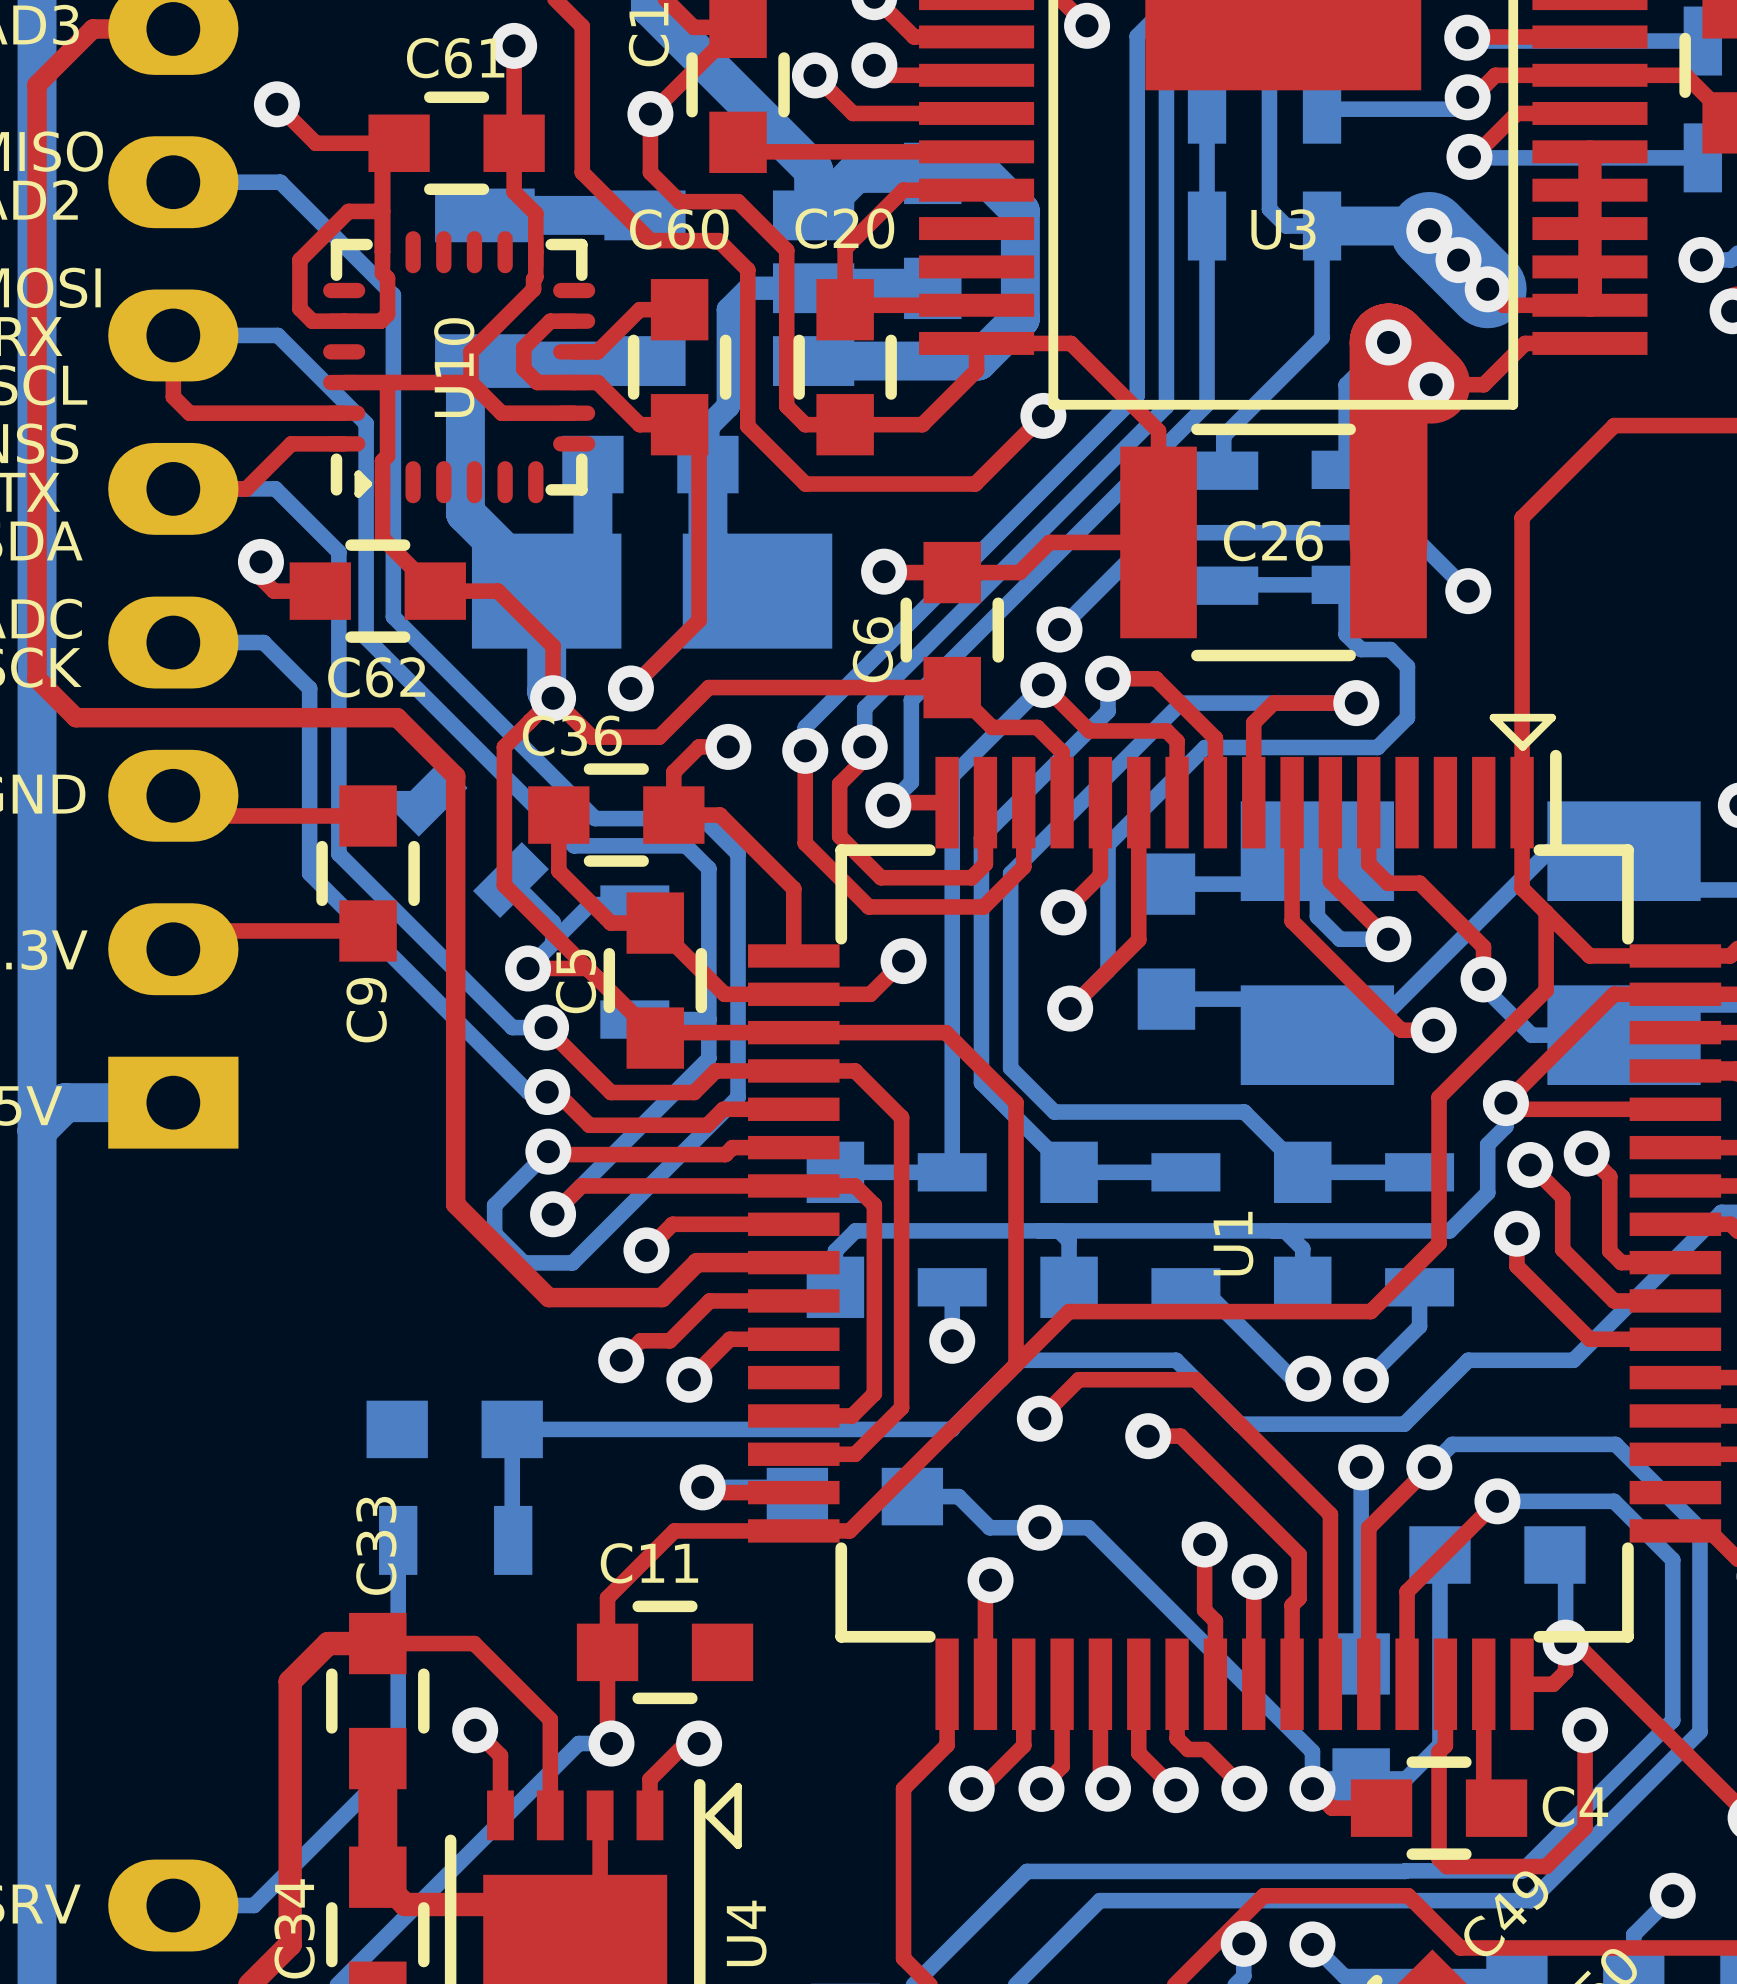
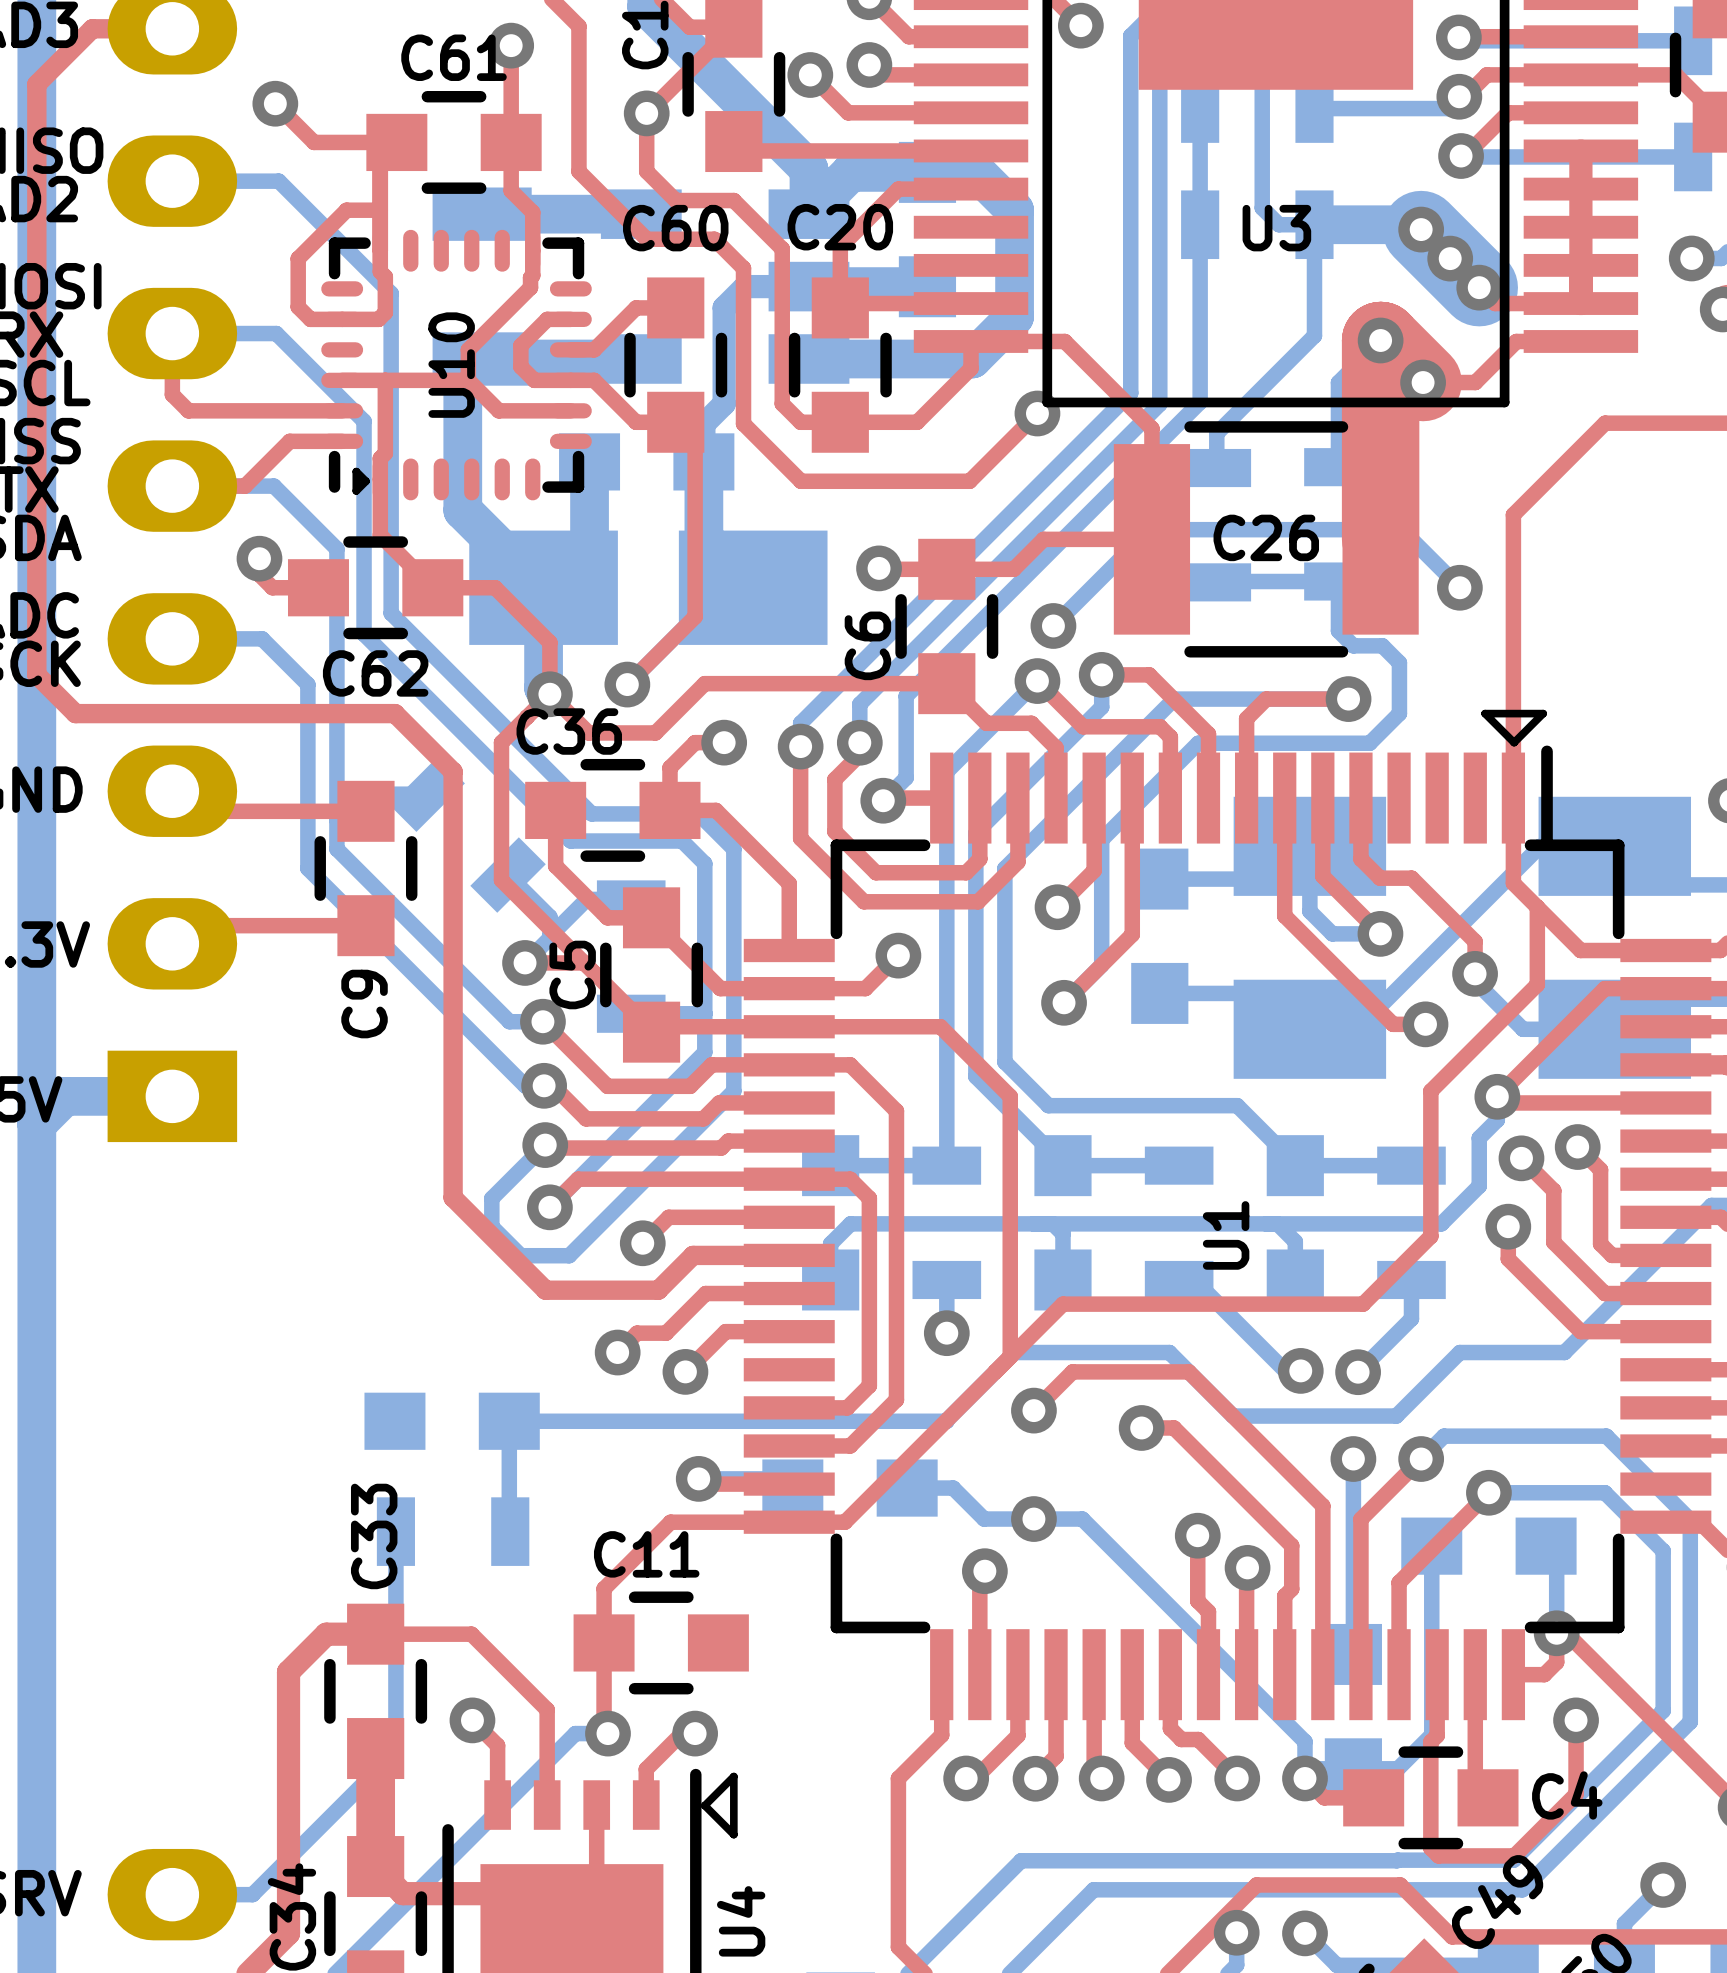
top track: (1585, 1804) (1585, 1827) (1546, 1866) (1523, 1866) -> (1576, 1794) (1514, 1855)

